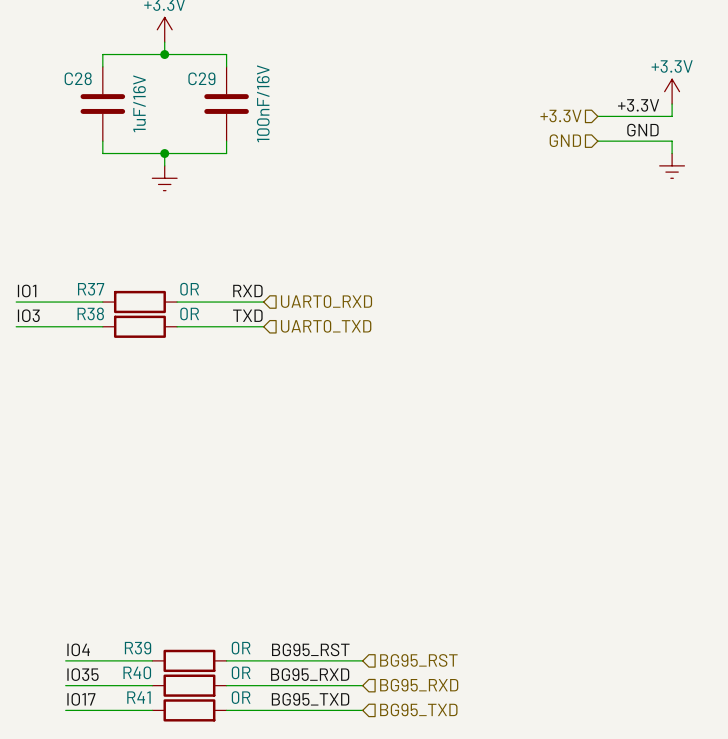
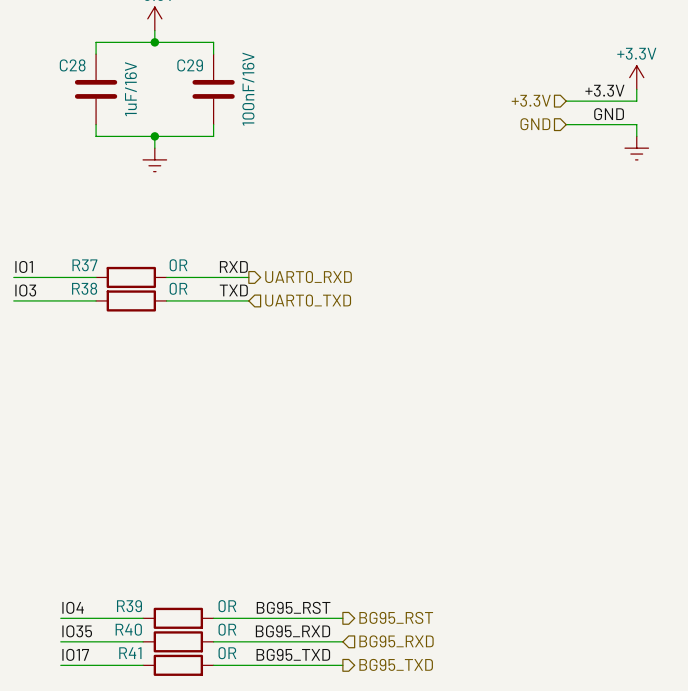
hierarchical label shape: input (326, 301) -> output (308, 277)
hierarchical label shape: input (418, 660) -> output (396, 617)
hierarchical label shape: input (418, 709) -> output (396, 664)

